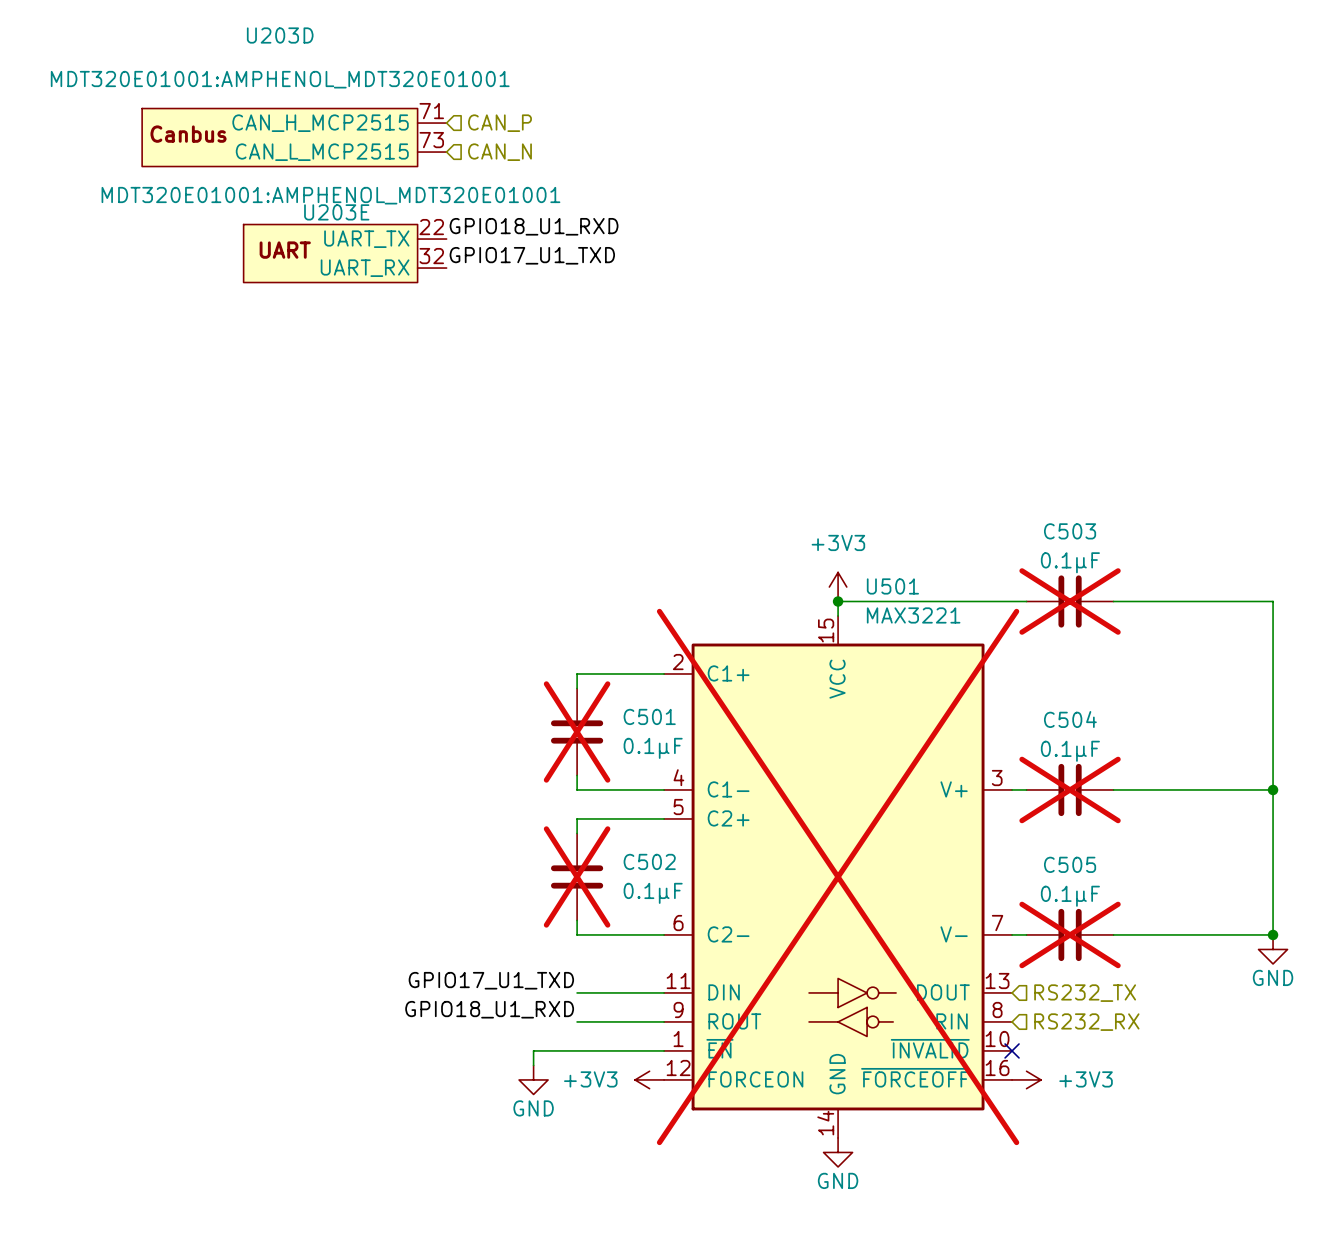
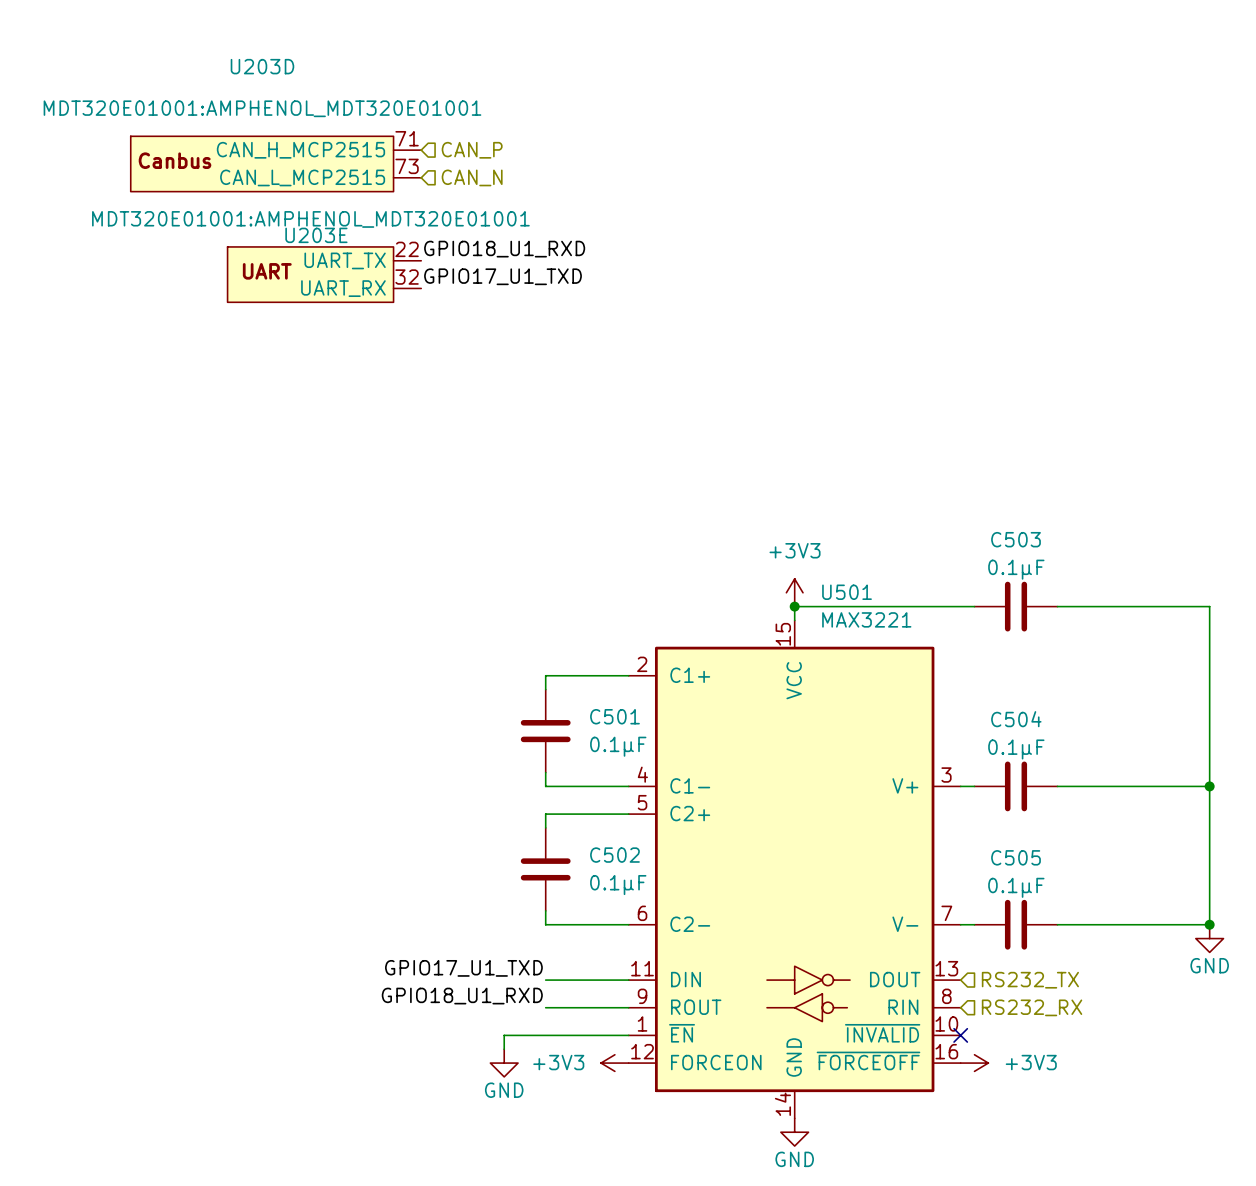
C503 do-not-place cross: (1070, 601) -> none
C501 do-not-place cross: (577, 731) -> none
C504 do-not-place cross: (1070, 789) -> none
C502 do-not-place cross: (577, 876) -> none
U501 do-not-place cross: (838, 876) -> none
C505 do-not-place cross: (1070, 934) -> none

